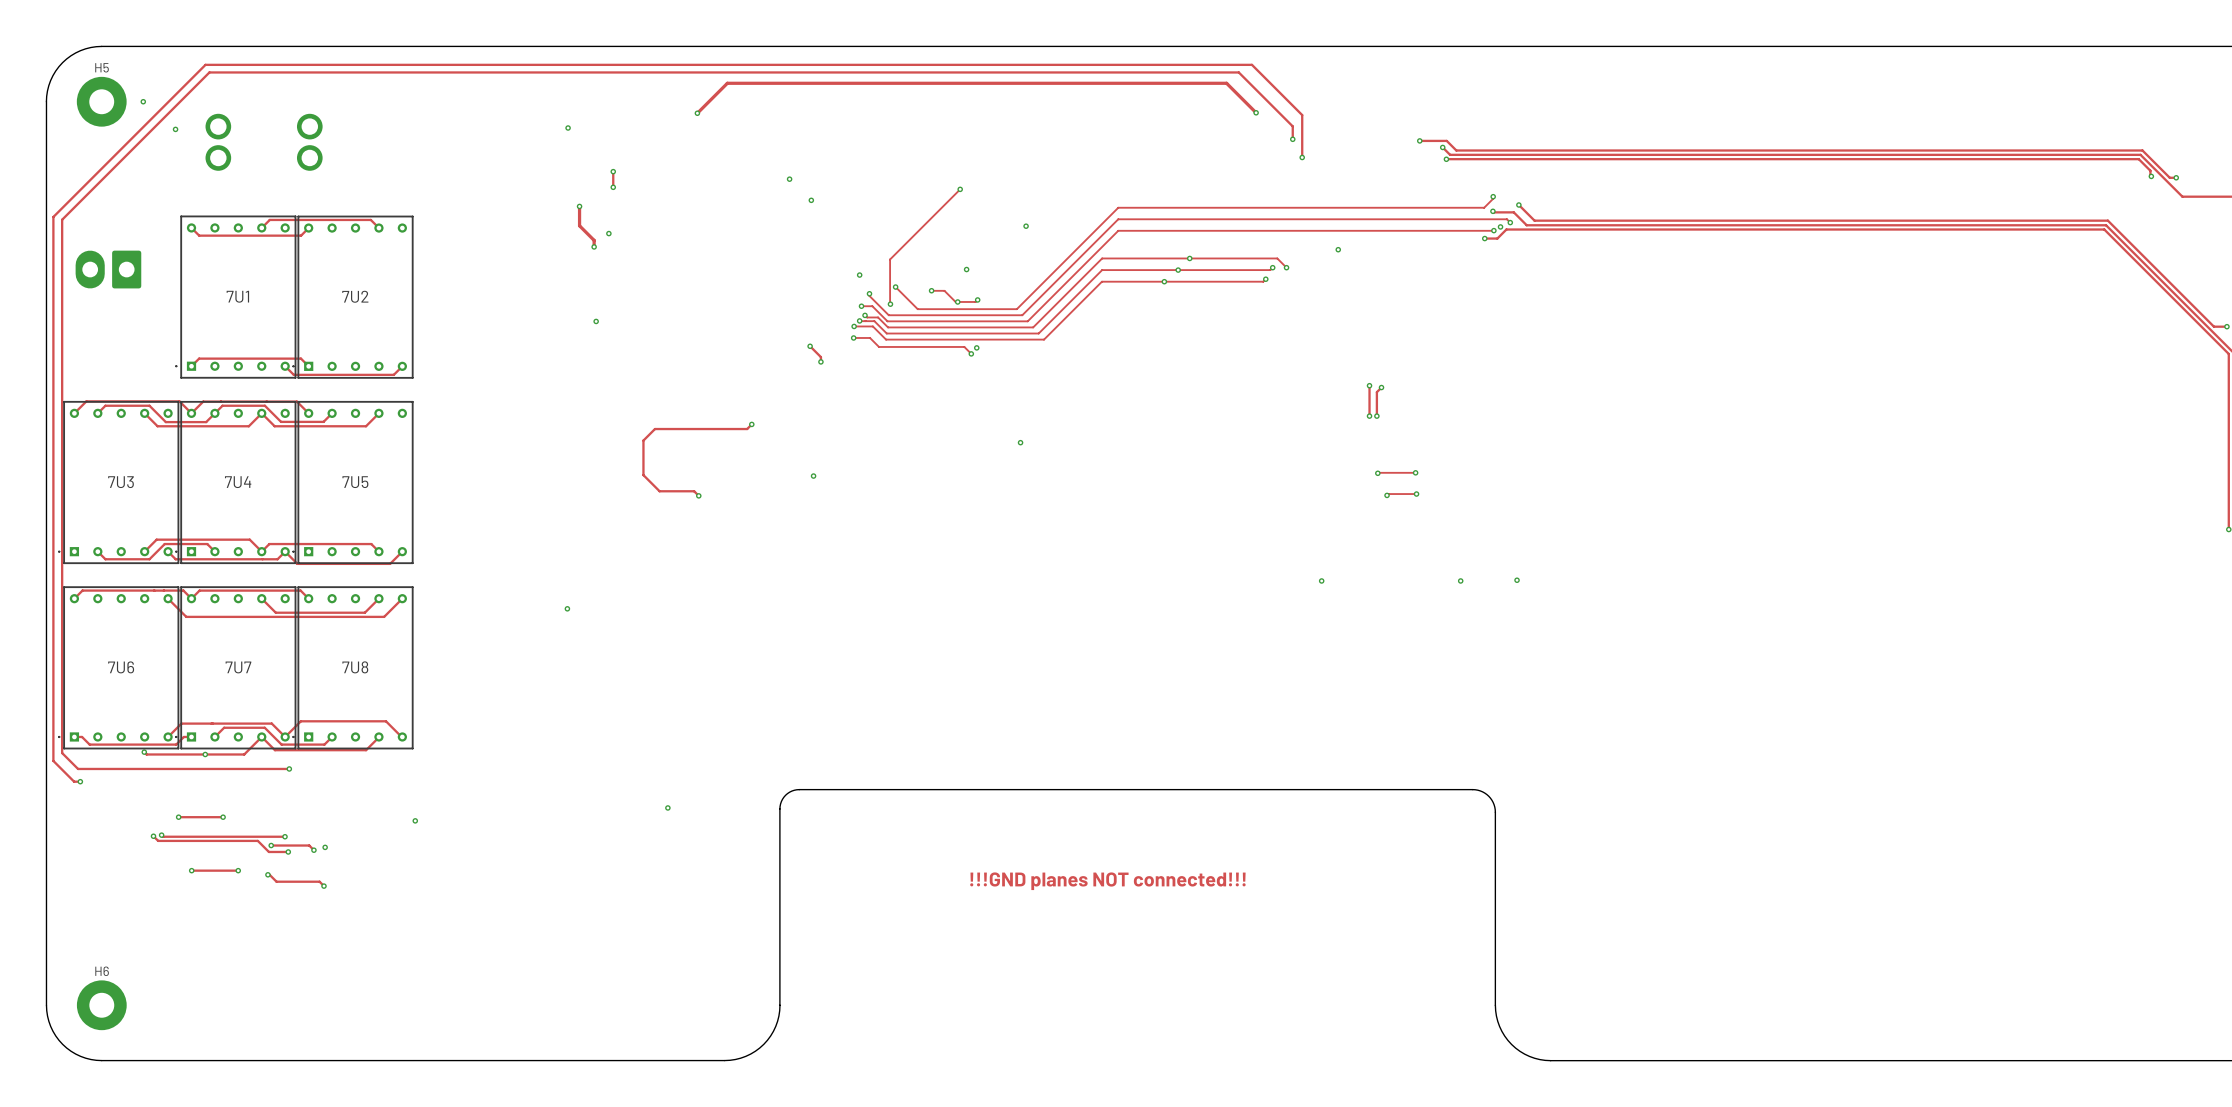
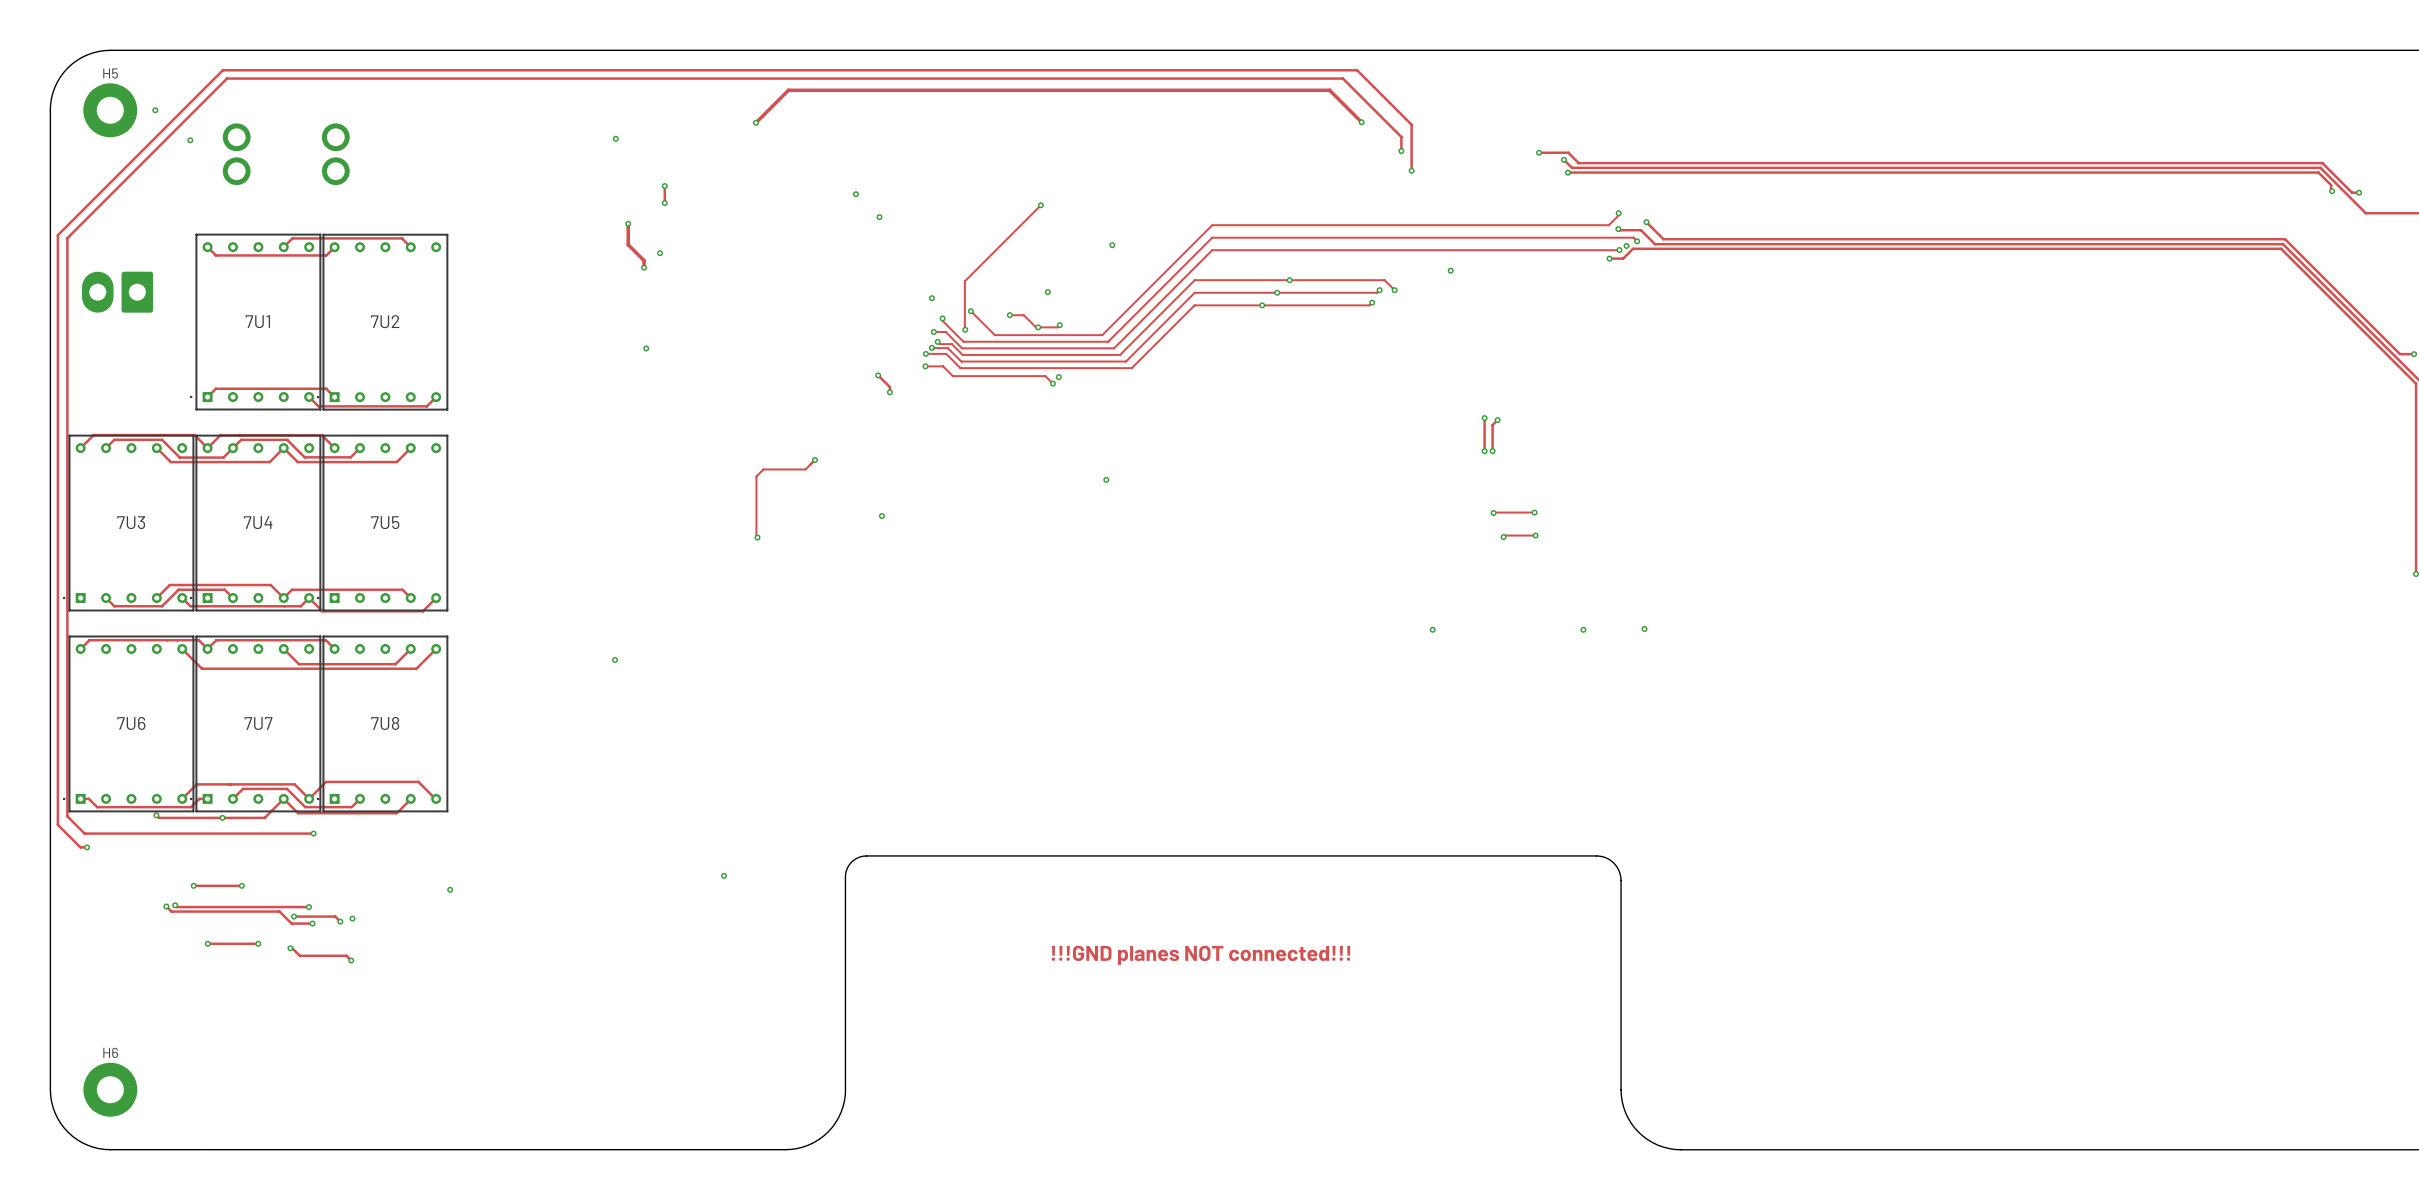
track: (747, 429) (654, 429) (643, 440) (643, 475) (659, 491) (694, 491) (698, 495) -> (809, 465) (805, 469) (763, 469) (756, 476) (756, 536)

